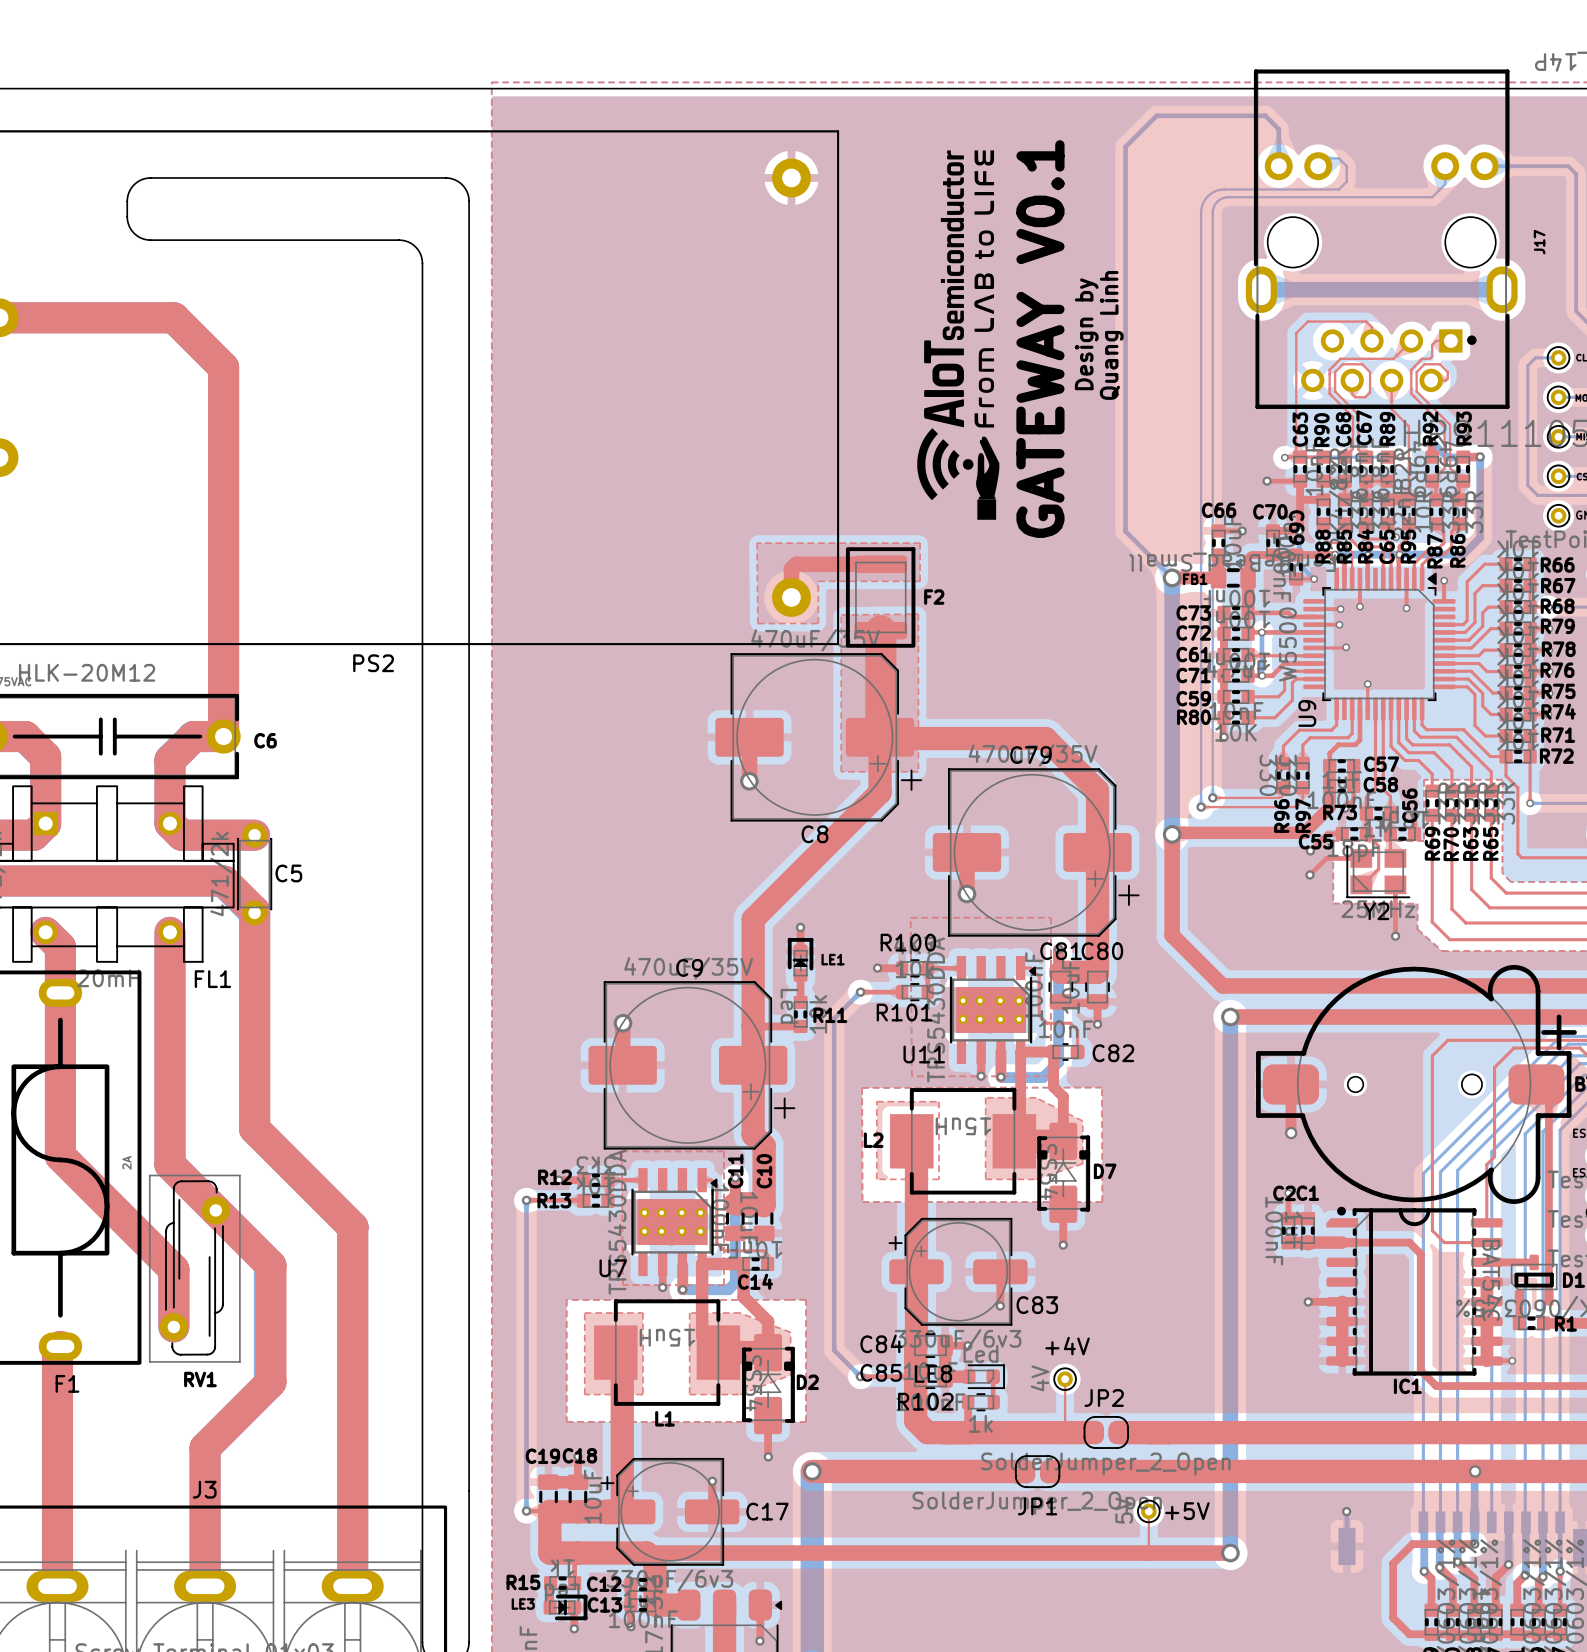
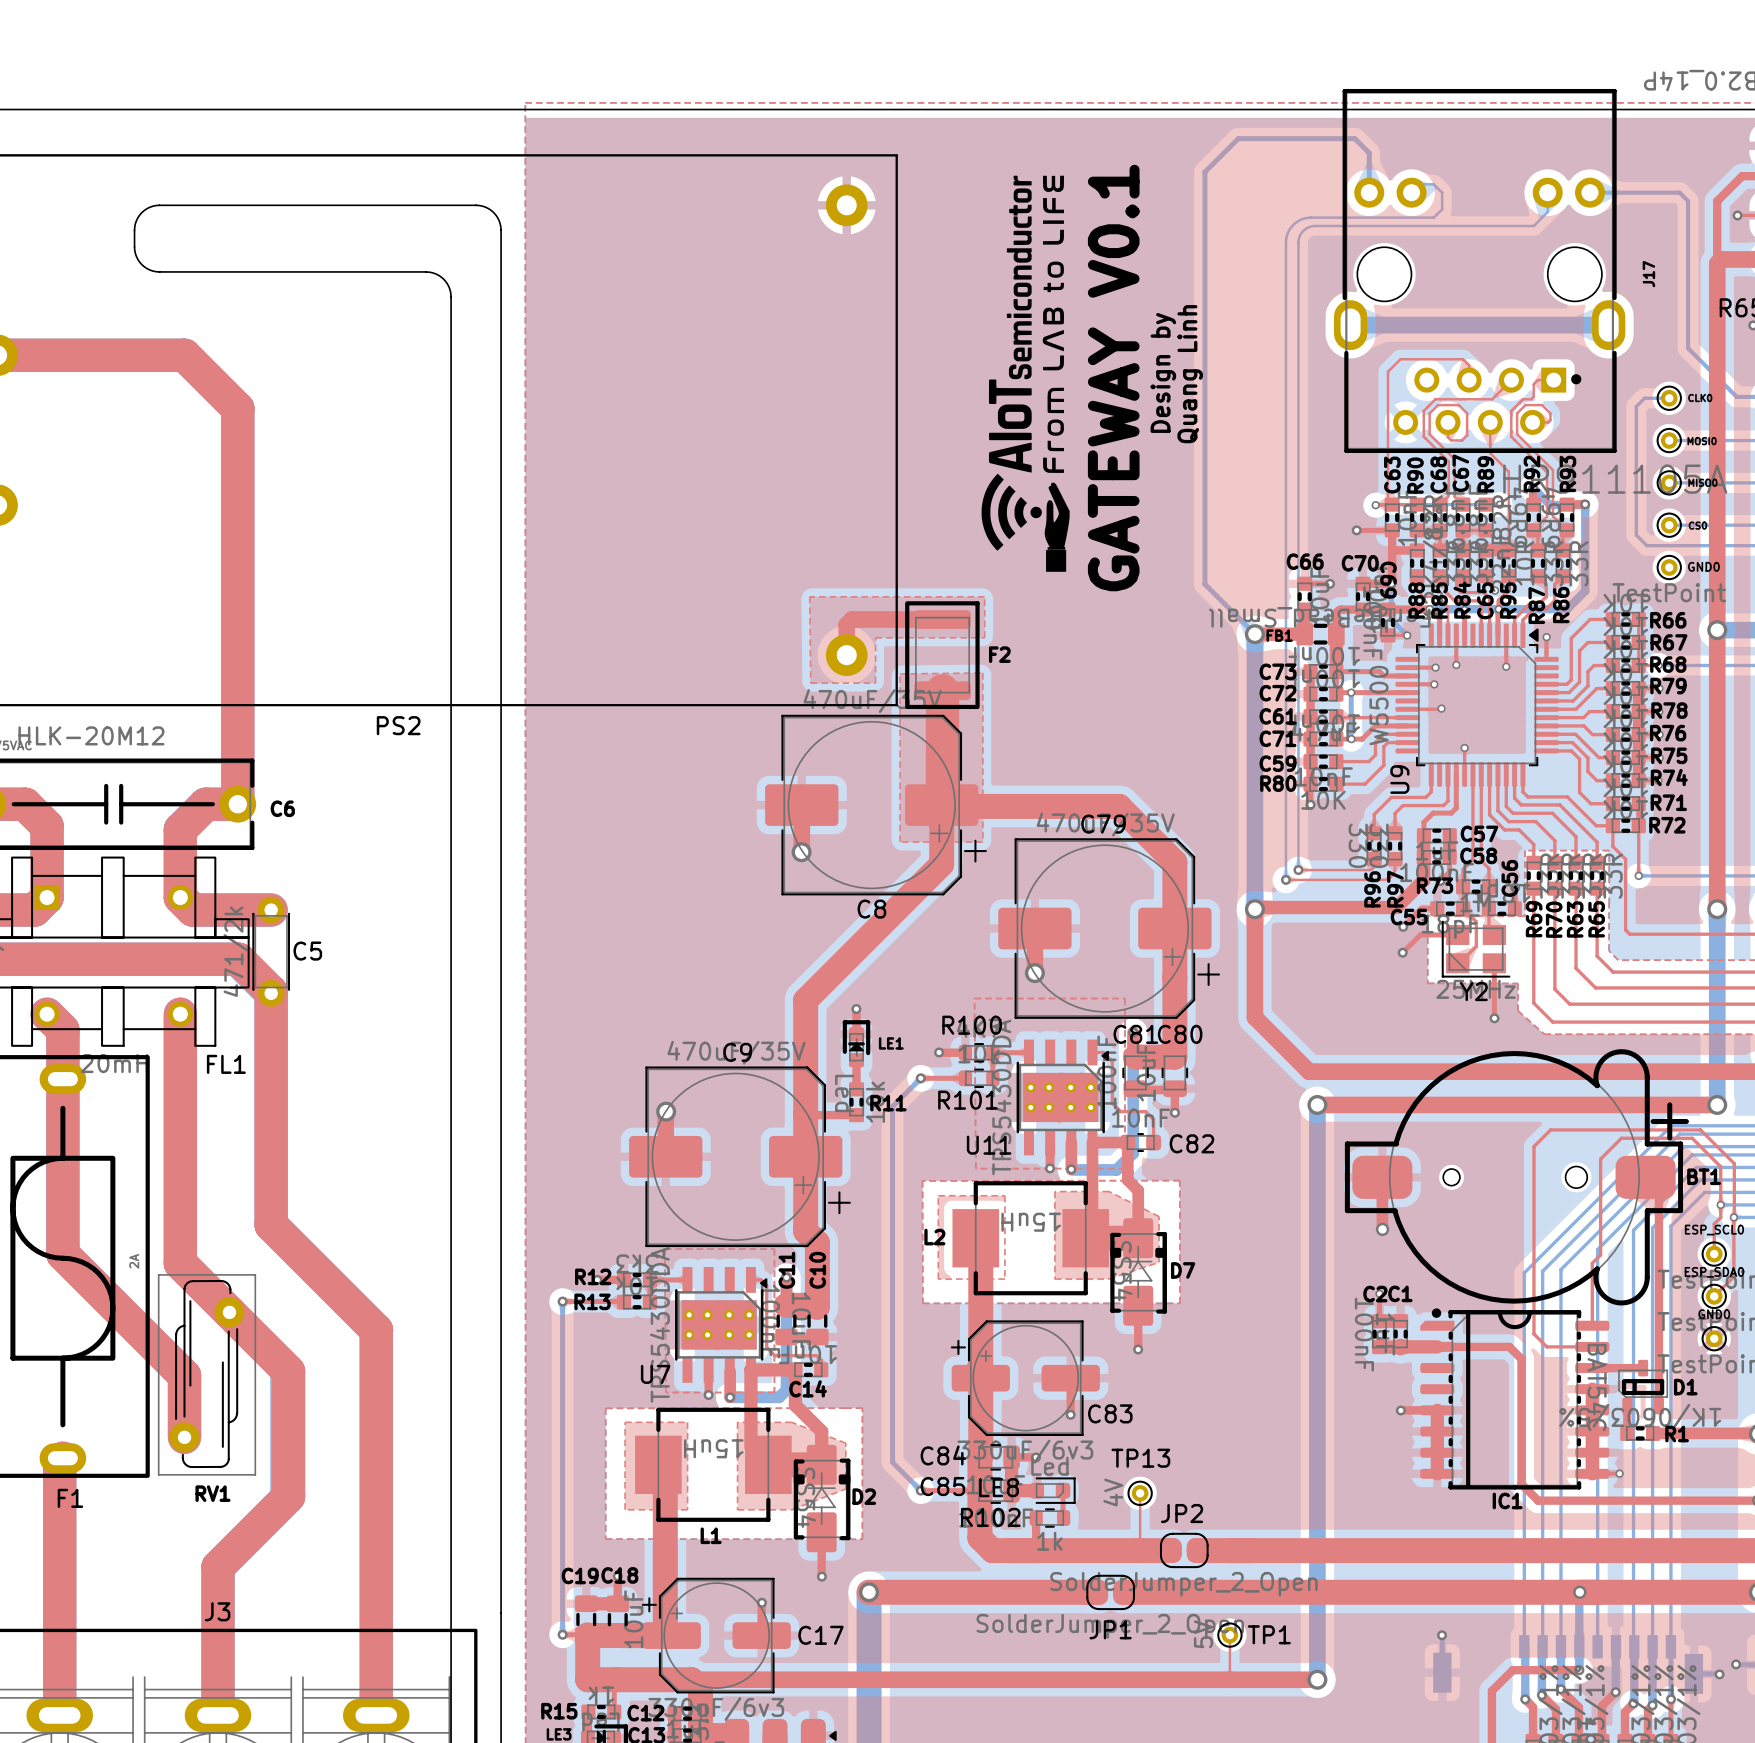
+4V name: +4V (1067, 1346) -> TP13 (1140, 1458)
+5V name: +5V (1187, 1511) -> TP1 (1269, 1634)

